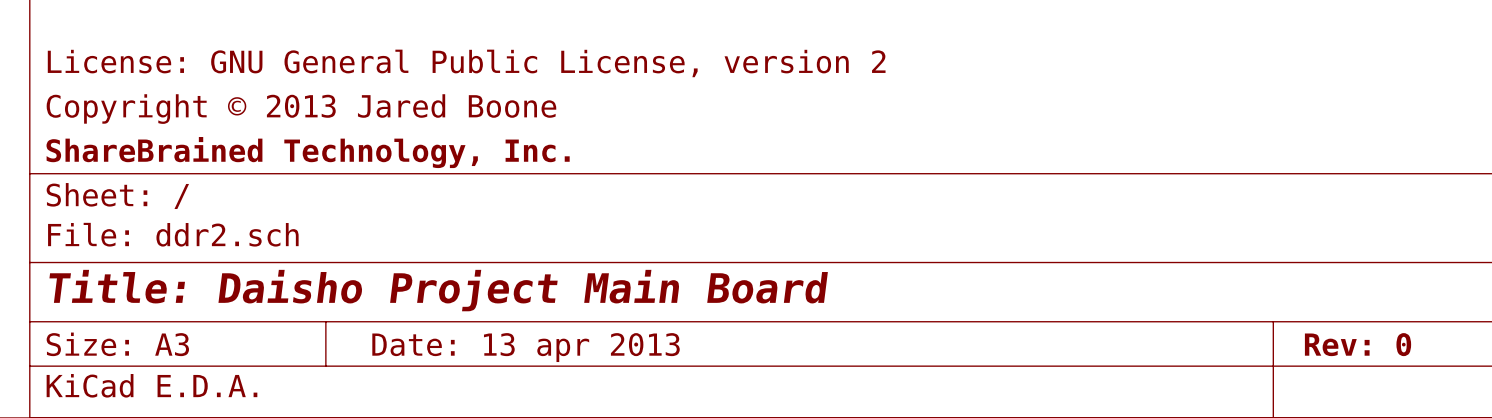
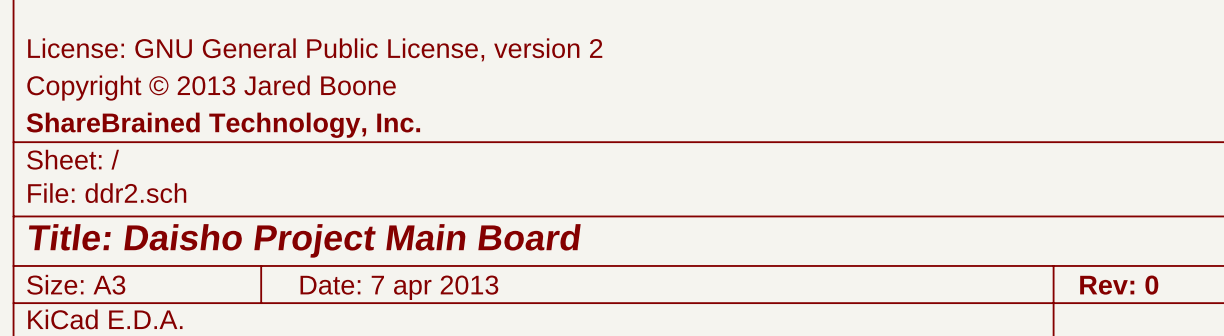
title block: Date: 13 apr 2013 (526, 347) -> Date: 7 apr 2013 (399, 287)

